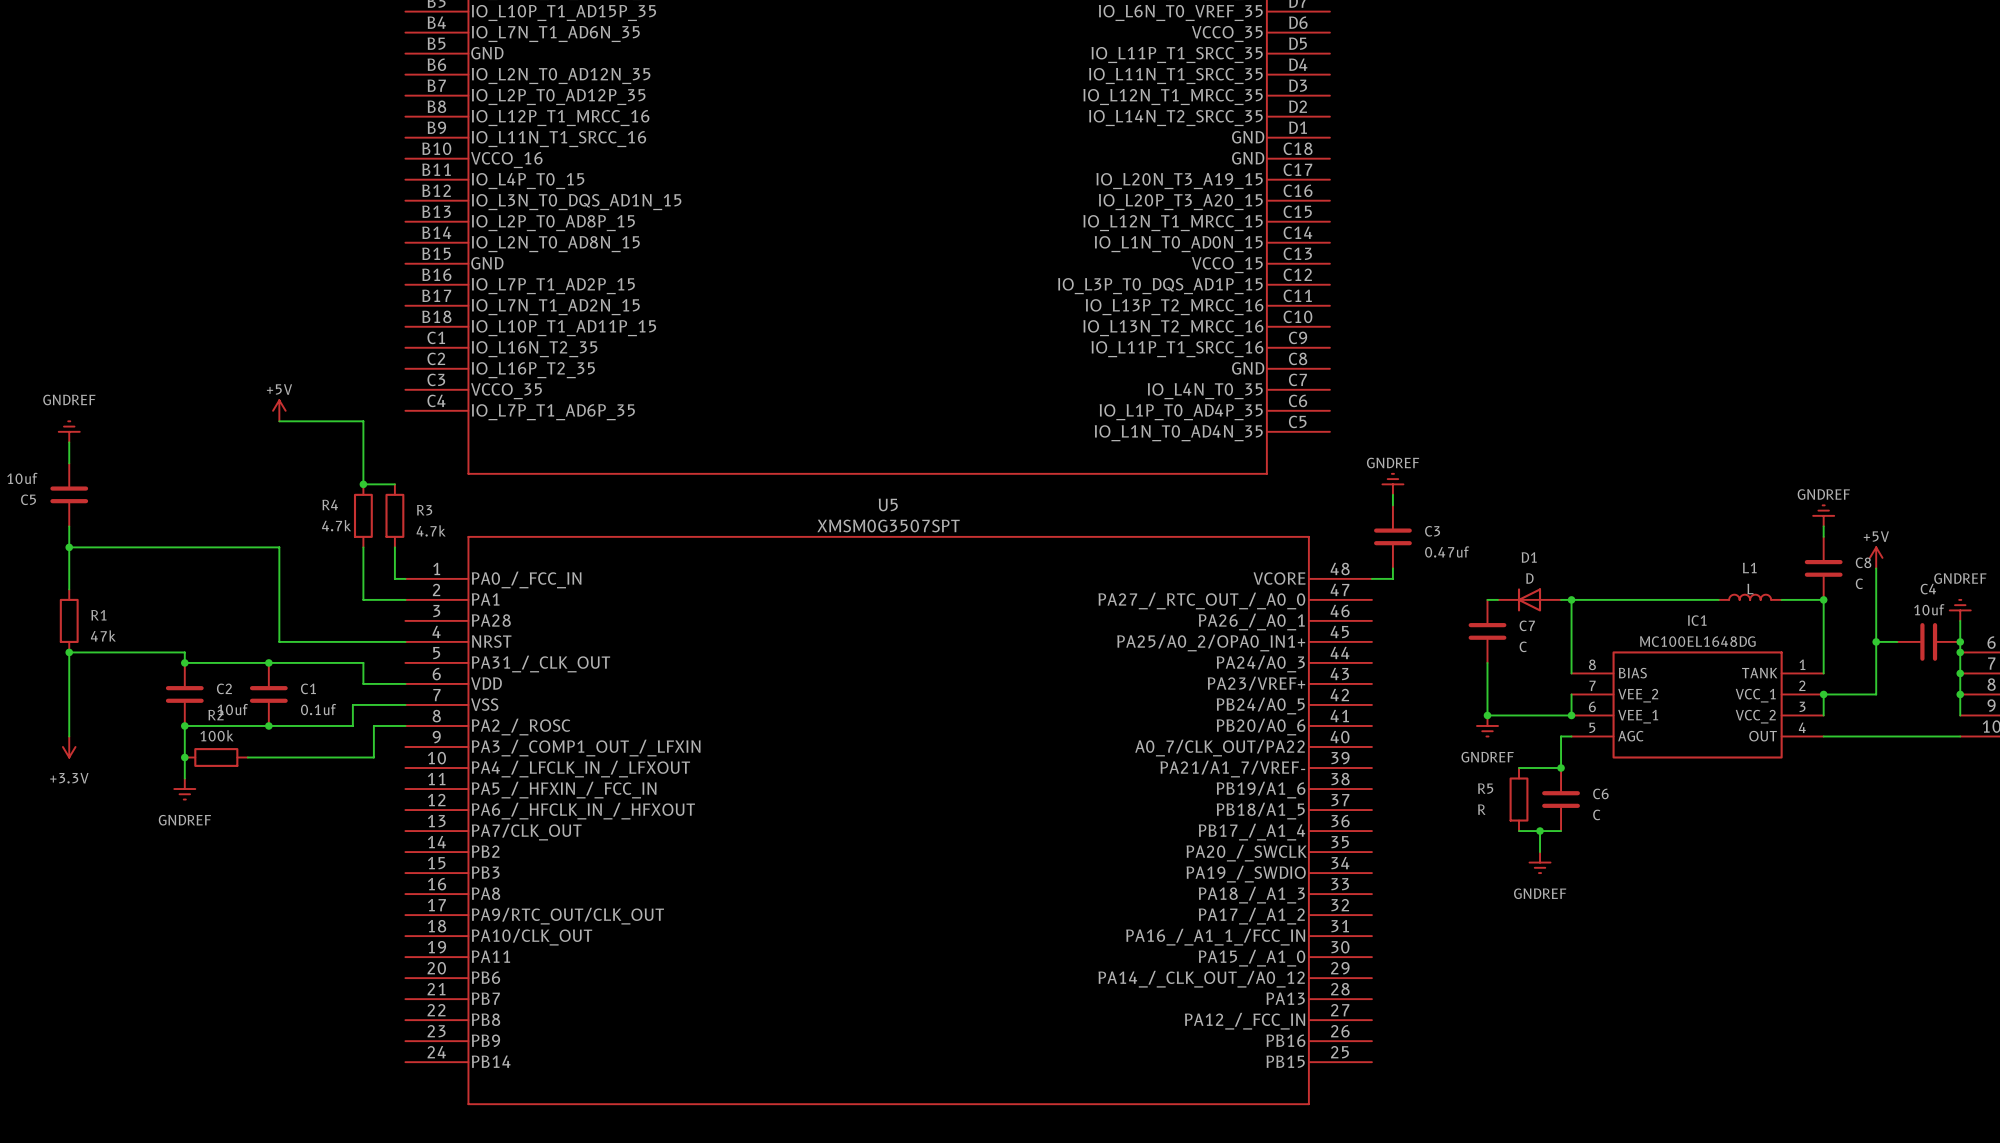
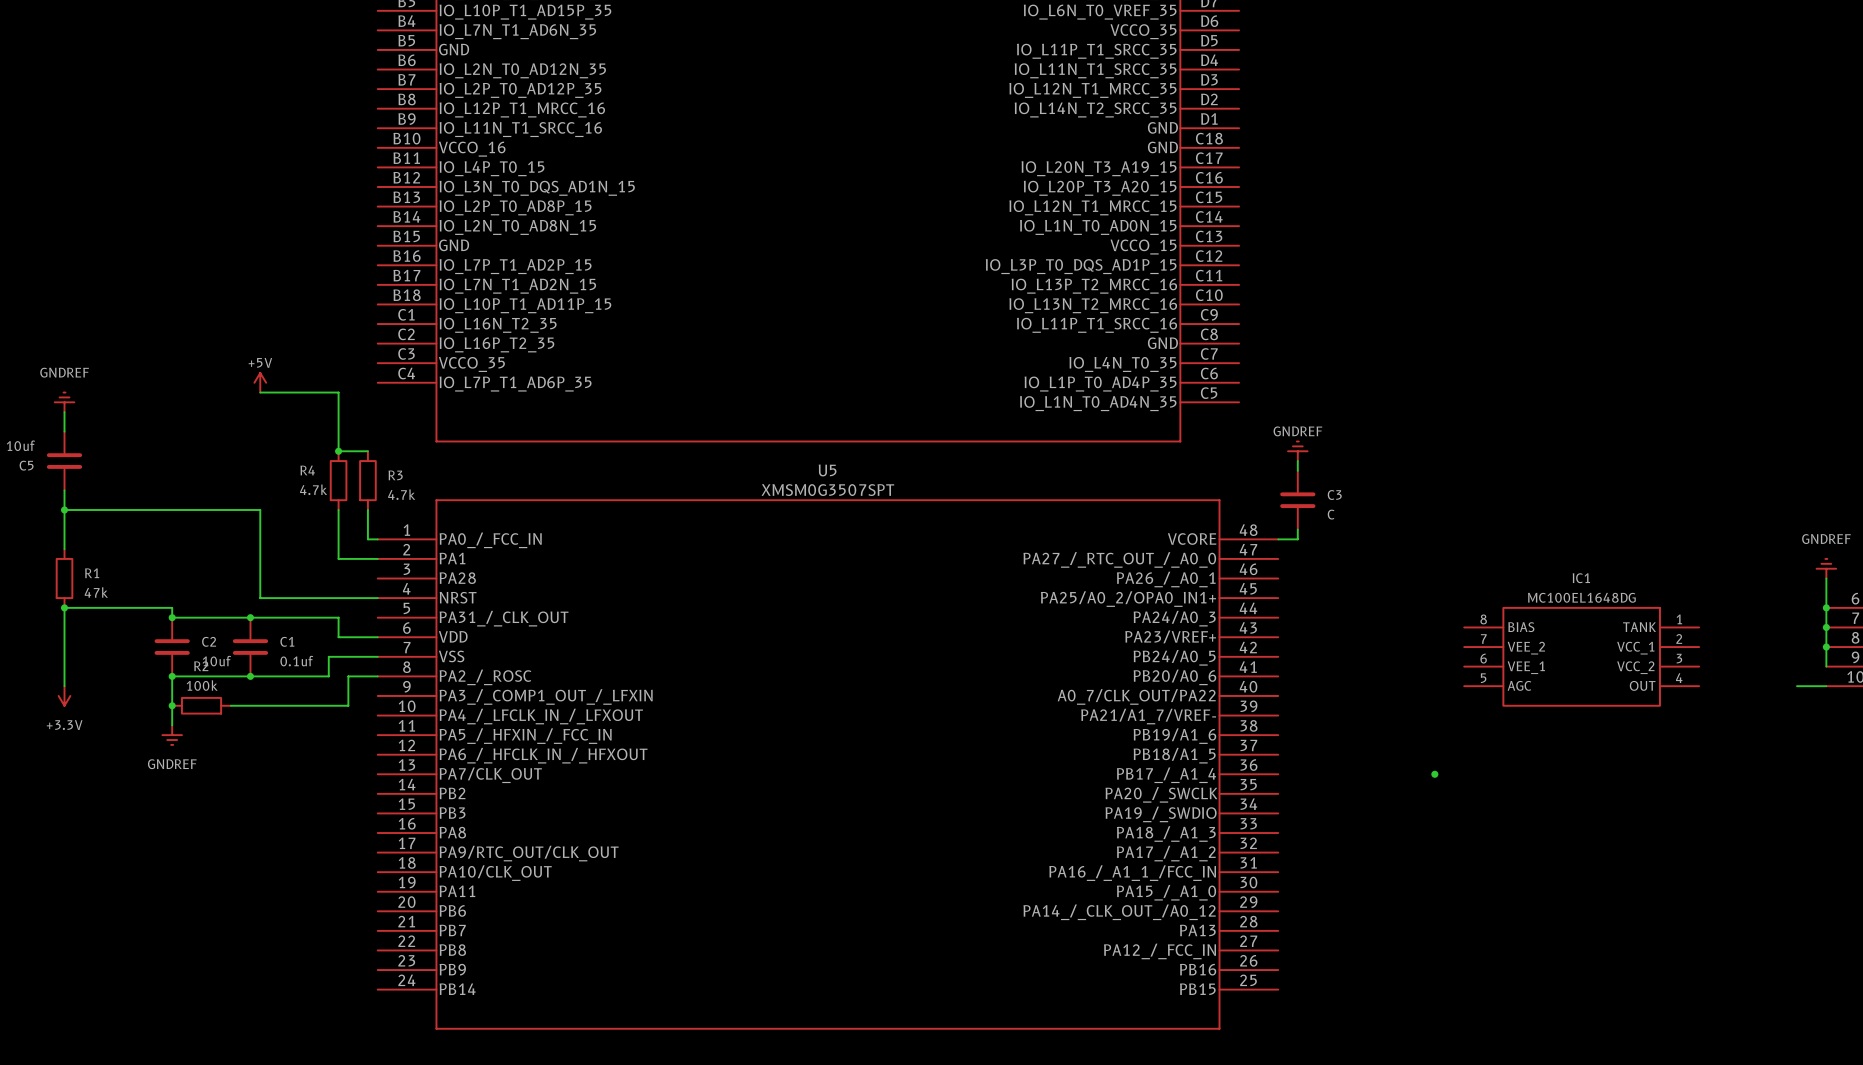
power symbol: GNDREF (1823, 515) -> none
wire: (1823, 526) (1823, 536) -> none
C3 value: 0.47uf (1447, 551) -> C (1331, 514)
power symbol: +5V (1876, 557) -> none
C8: C (1823, 568) -> none
wire: (1876, 568) (1876, 694) (1823, 694) (1823, 715) -> none
L1: L (1750, 597) -> none
wire: (1487, 599) (1498, 599) -> none
D1: D (1529, 599) -> none
wire: (1561, 599) (1718, 599) -> none
wire: (1571, 599) (1571, 673) -> none
junction: (1571, 599) -> none
wire: (1781, 599) (1823, 599) (1823, 673) -> none
junction: (1823, 599) -> none
C7: C (1487, 631) -> none
wire: (1876, 641) (1897, 641) -> none
junction: (1876, 641) -> none
C4: 10uf (1928, 641) -> none
junction: (1960, 641) -> none
wire: (1487, 662) (1487, 715) (1571, 715) (1571, 694) -> none
junction: (1823, 694) -> none
junction: (1487, 715) -> none
junction: (1571, 715) -> none
power symbol: GNDREF (1487, 725) -> none
wire: (1571, 736) (1561, 736) (1561, 768) (1519, 768) -> none
wire: (1823, 736) (1928, 736) -> none
junction: (1561, 768) -> none
R5: R (1519, 799) -> none
C6: C (1561, 799) -> none
wire: (1519, 831) (1561, 831) -> none
wire: (1540, 831) (1540, 852) -> none
power symbol: GNDREF (1540, 862) -> none

